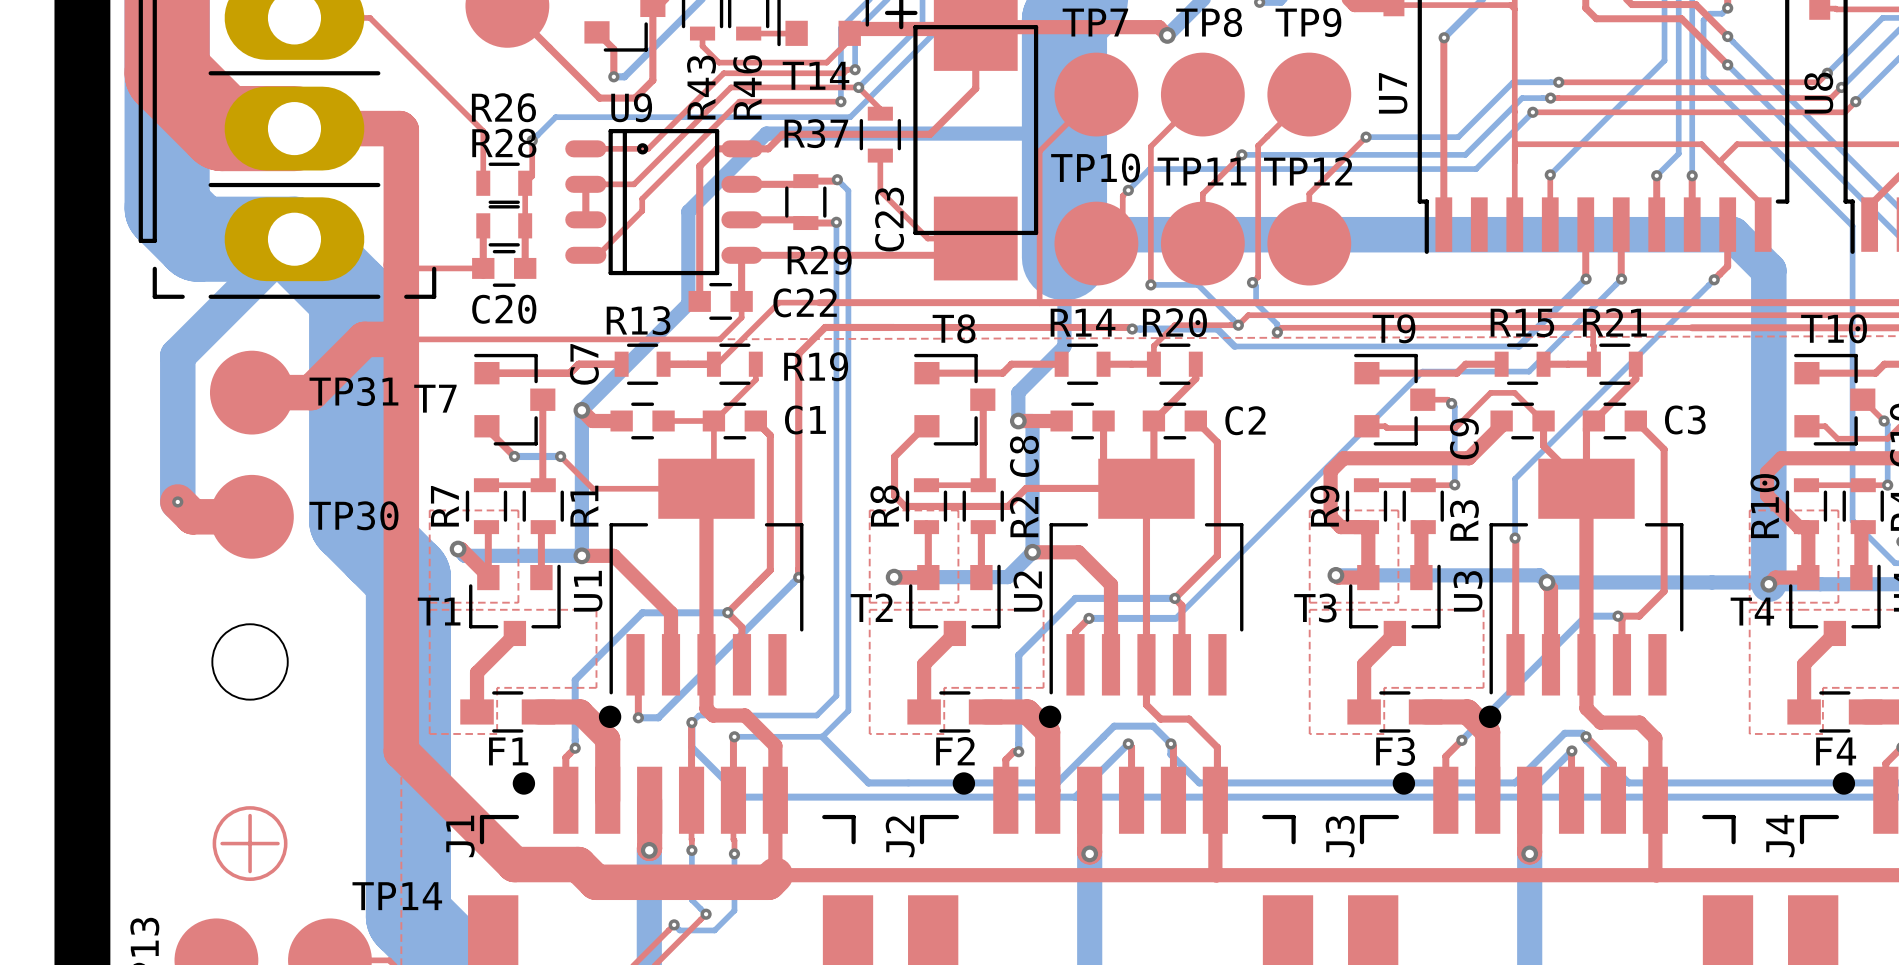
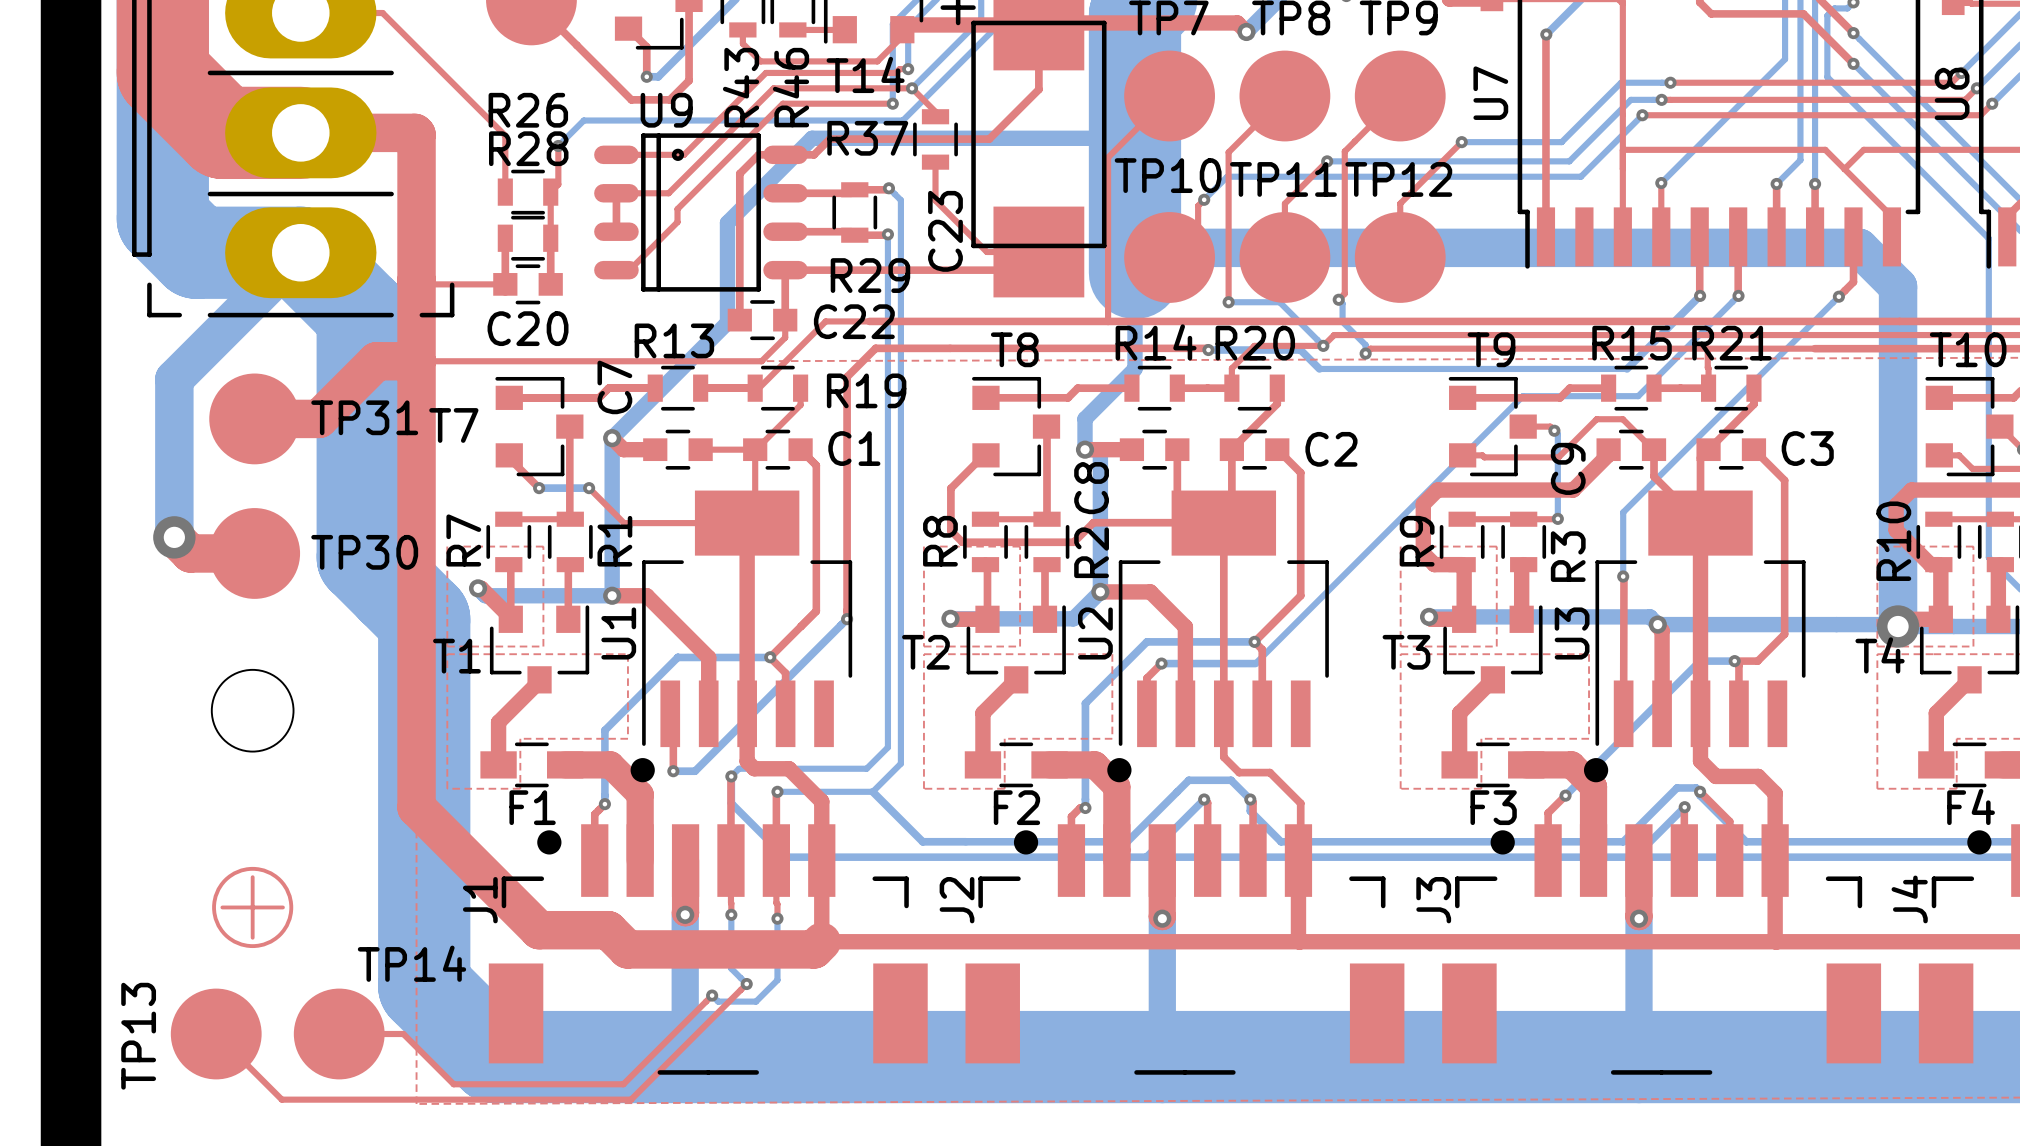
via size: [172, 496, 184, 508] -> [153, 516, 196, 559]
via size: [1760, 575, 1778, 593] -> [1876, 605, 1920, 648]

